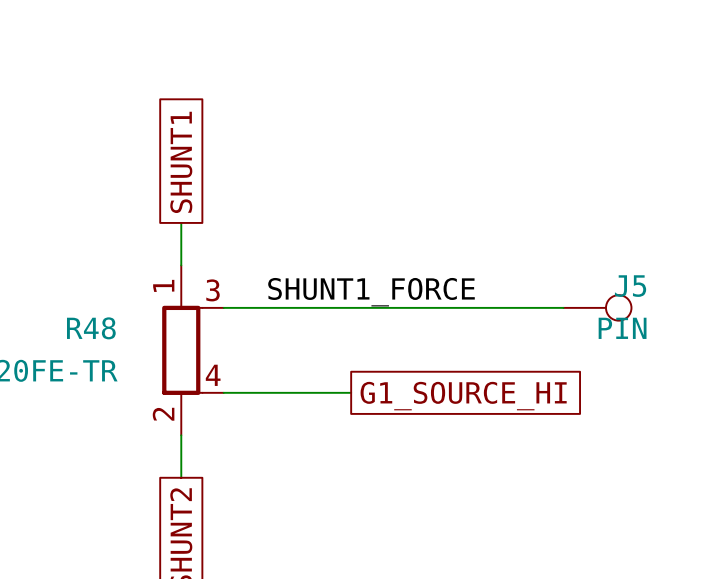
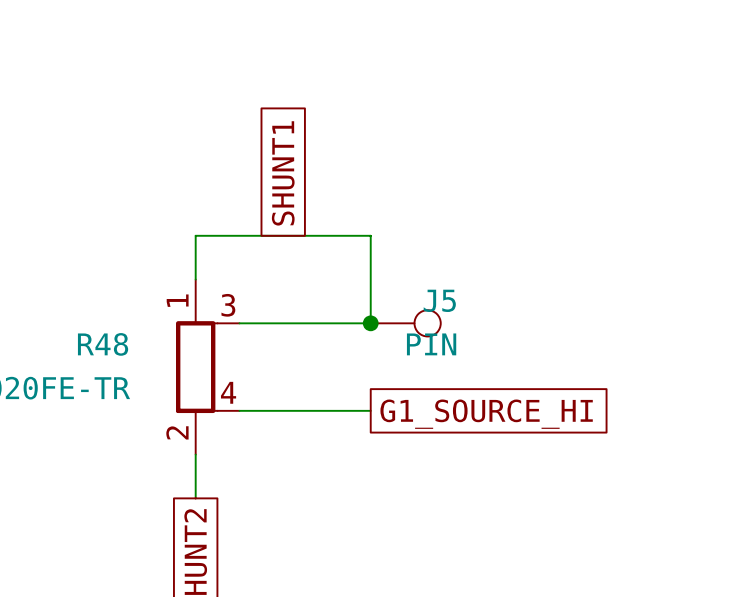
global label position: SHUNT1 (181, 162) -> SHUNT1 (283, 173)
label: SHUNT1_FORCE (371, 292) -> none
wire: (351, 307) (563, 307) -> (370, 323) (370, 235) (195, 235)
junction: none -> (370, 323)
J5 position: (597, 307) -> (405, 323)

